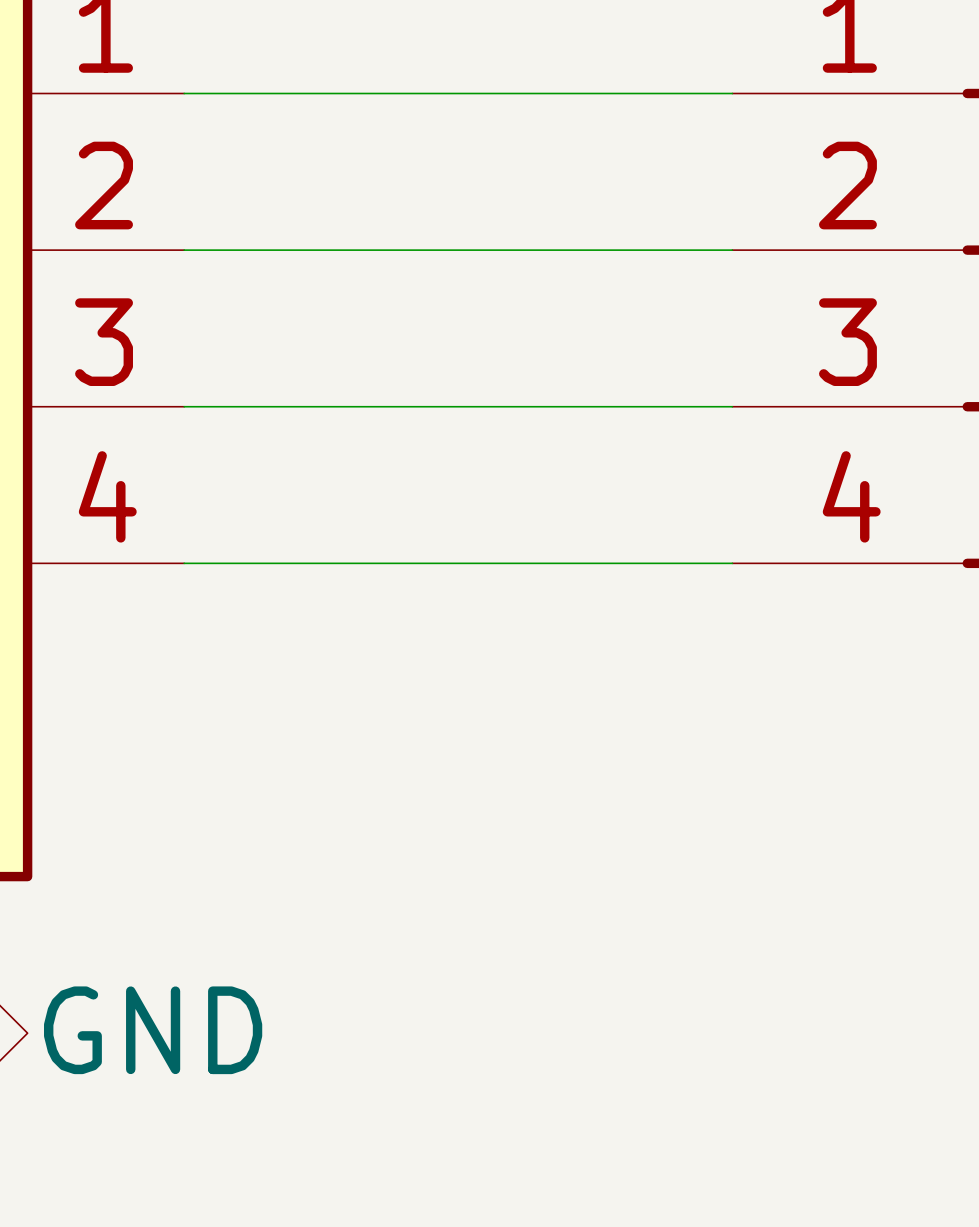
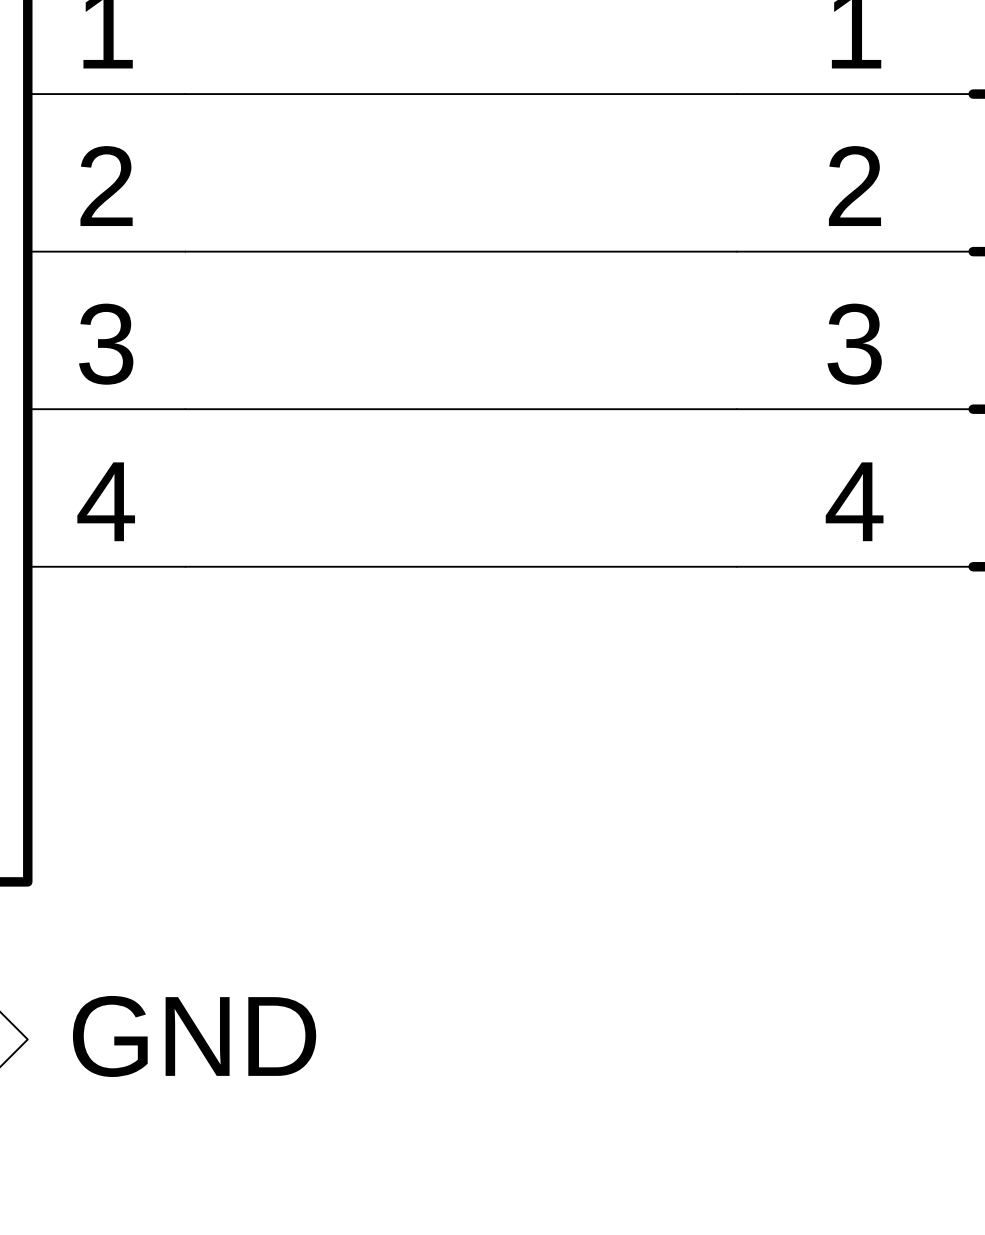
power symbol text position: GND (153, 1030) -> GND (194, 1036)

